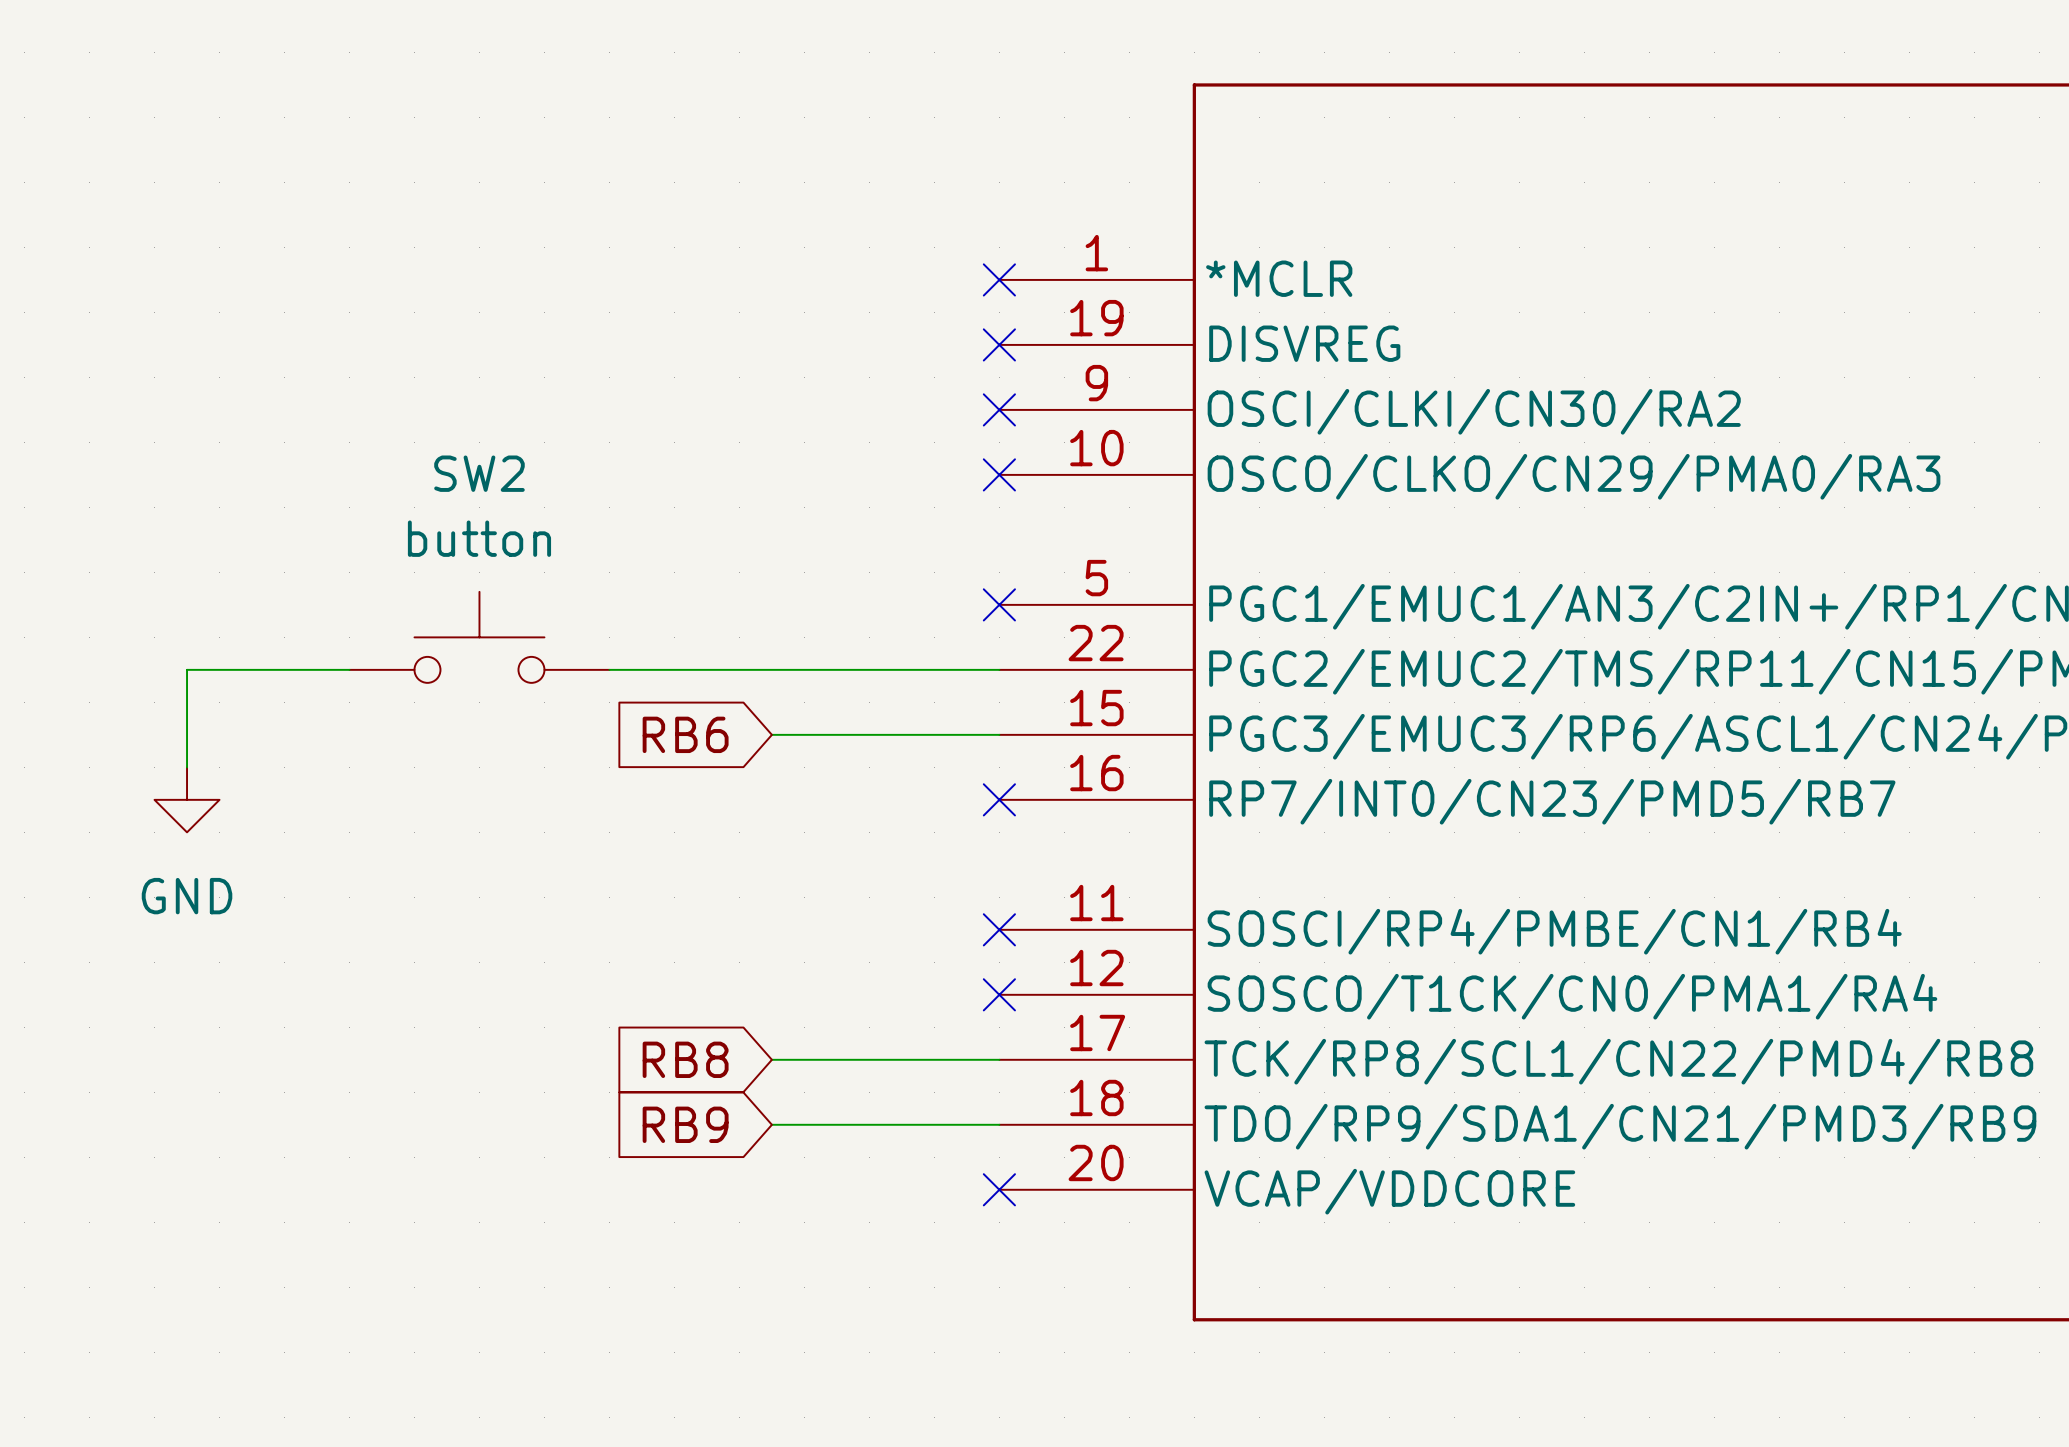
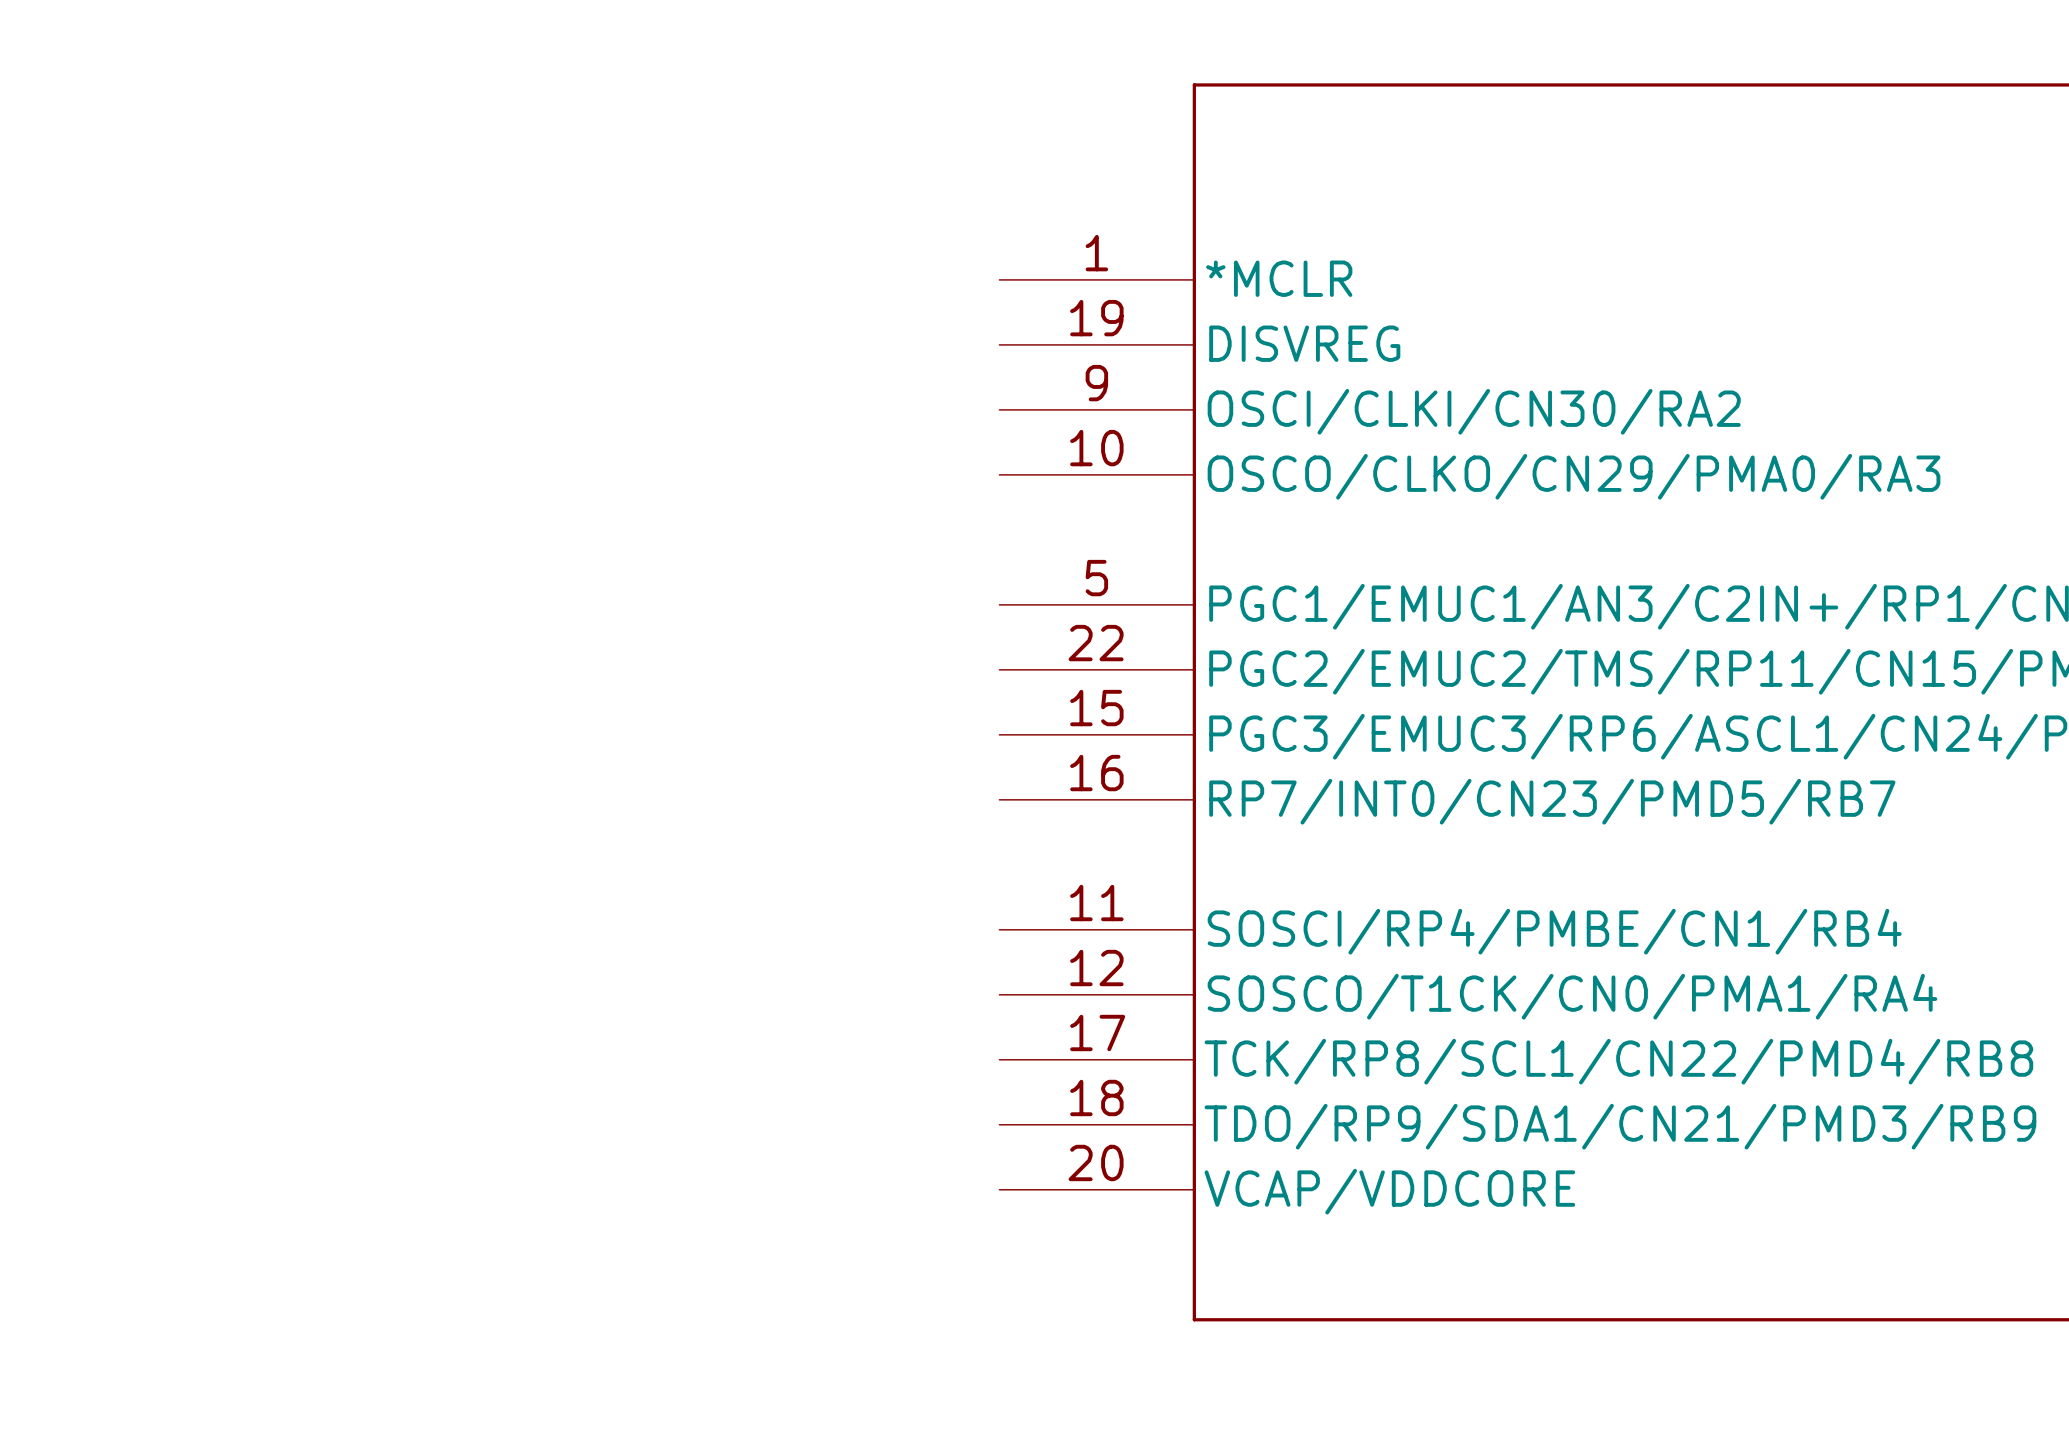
no-connect mark: (999, 279) -> none
no-connect mark: (999, 344) -> none
no-connect mark: (999, 409) -> none
no-connect mark: (999, 474) -> none
no-connect mark: (999, 604) -> none
SW2: button (479, 637) -> none
wire: (349, 669) (187, 669) (187, 767) -> none
wire: (609, 669) (999, 669) -> none
global label: RB6 (685, 734) -> none
wire: (771, 734) (999, 734) -> none
power symbol: GND (187, 799) -> none
no-connect mark: (999, 799) -> none
no-connect mark: (999, 929) -> none
no-connect mark: (999, 994) -> none
global label: RB8 (685, 1059) -> none
wire: (771, 1059) (999, 1059) -> none
global label: RB9 (685, 1124) -> none
wire: (771, 1124) (999, 1124) -> none
no-connect mark: (999, 1189) -> none

